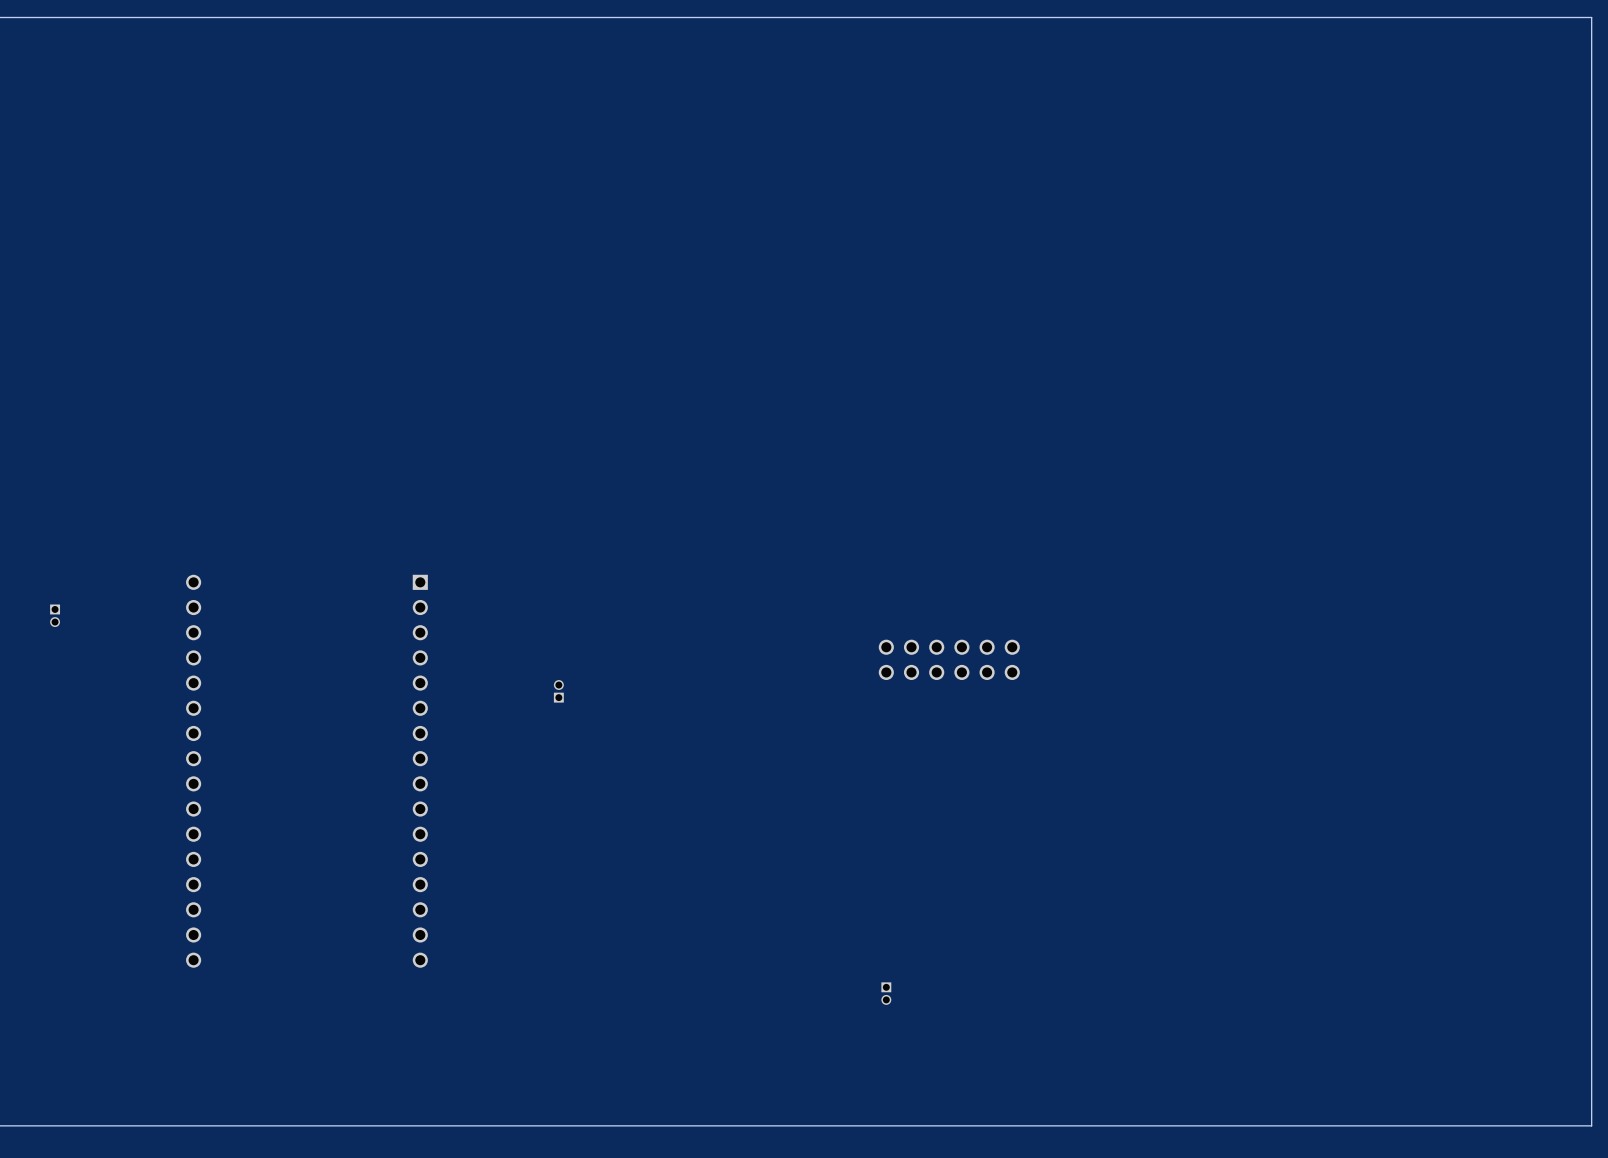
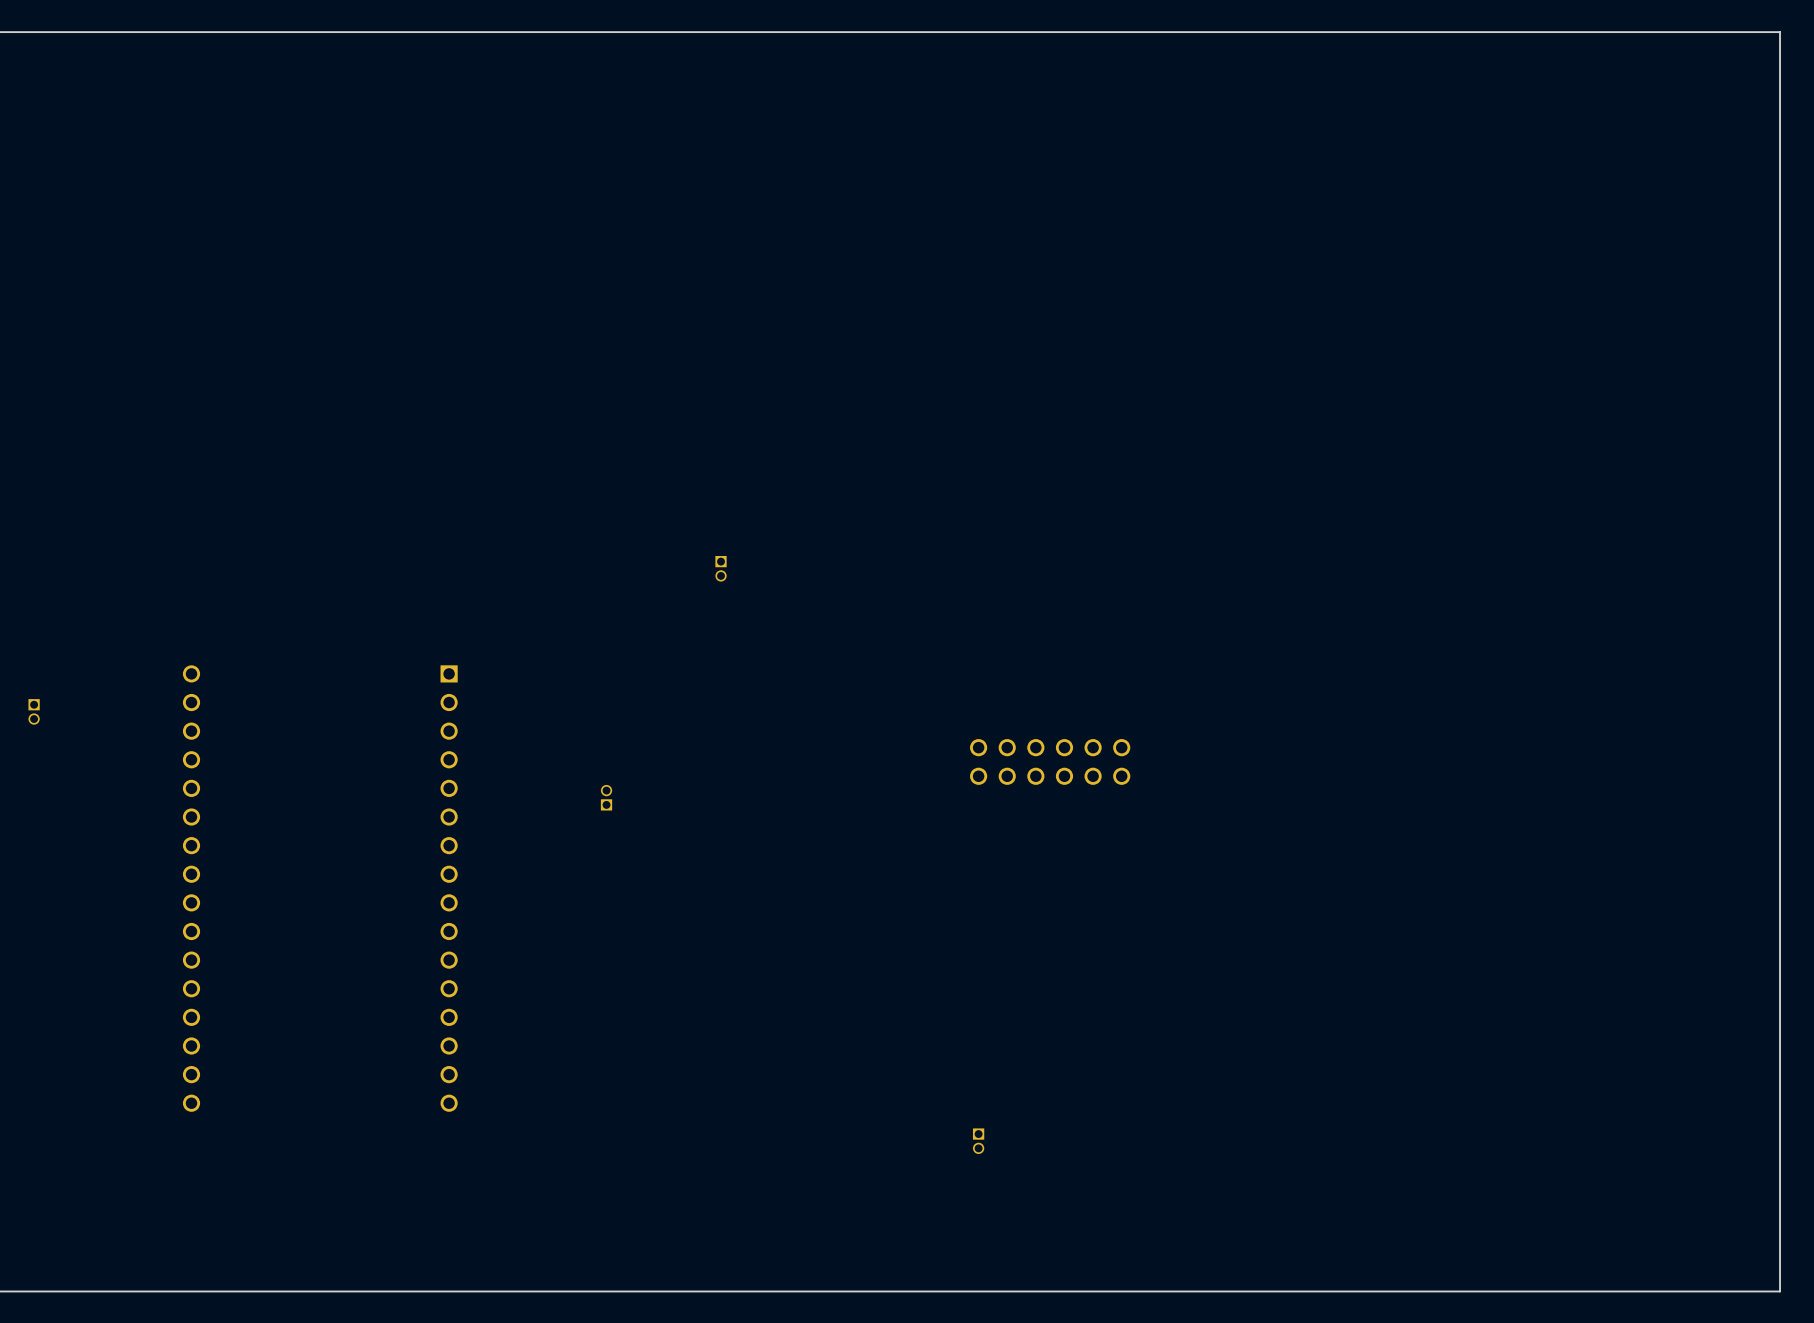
part: none -> (721, 568)

